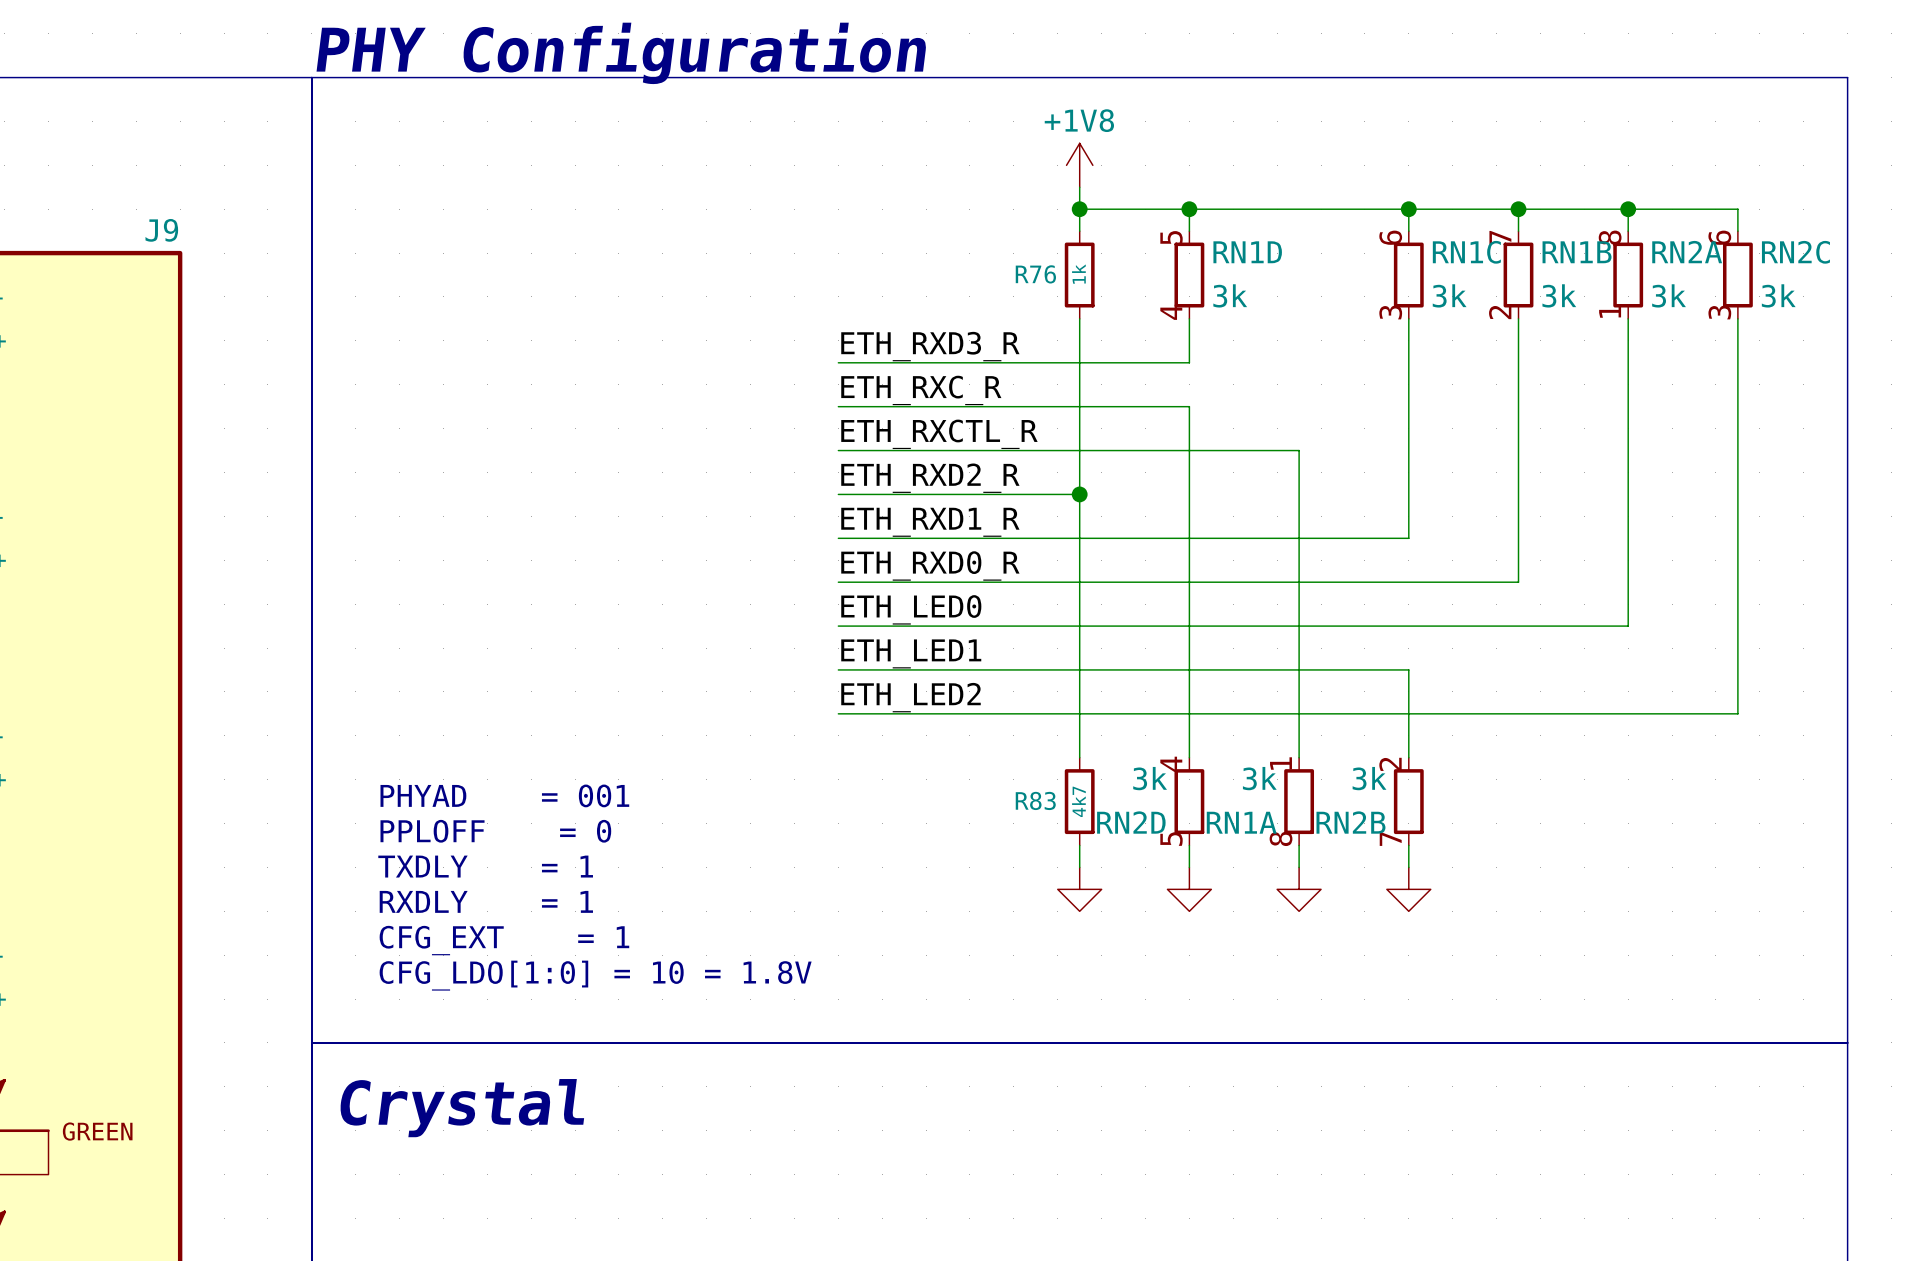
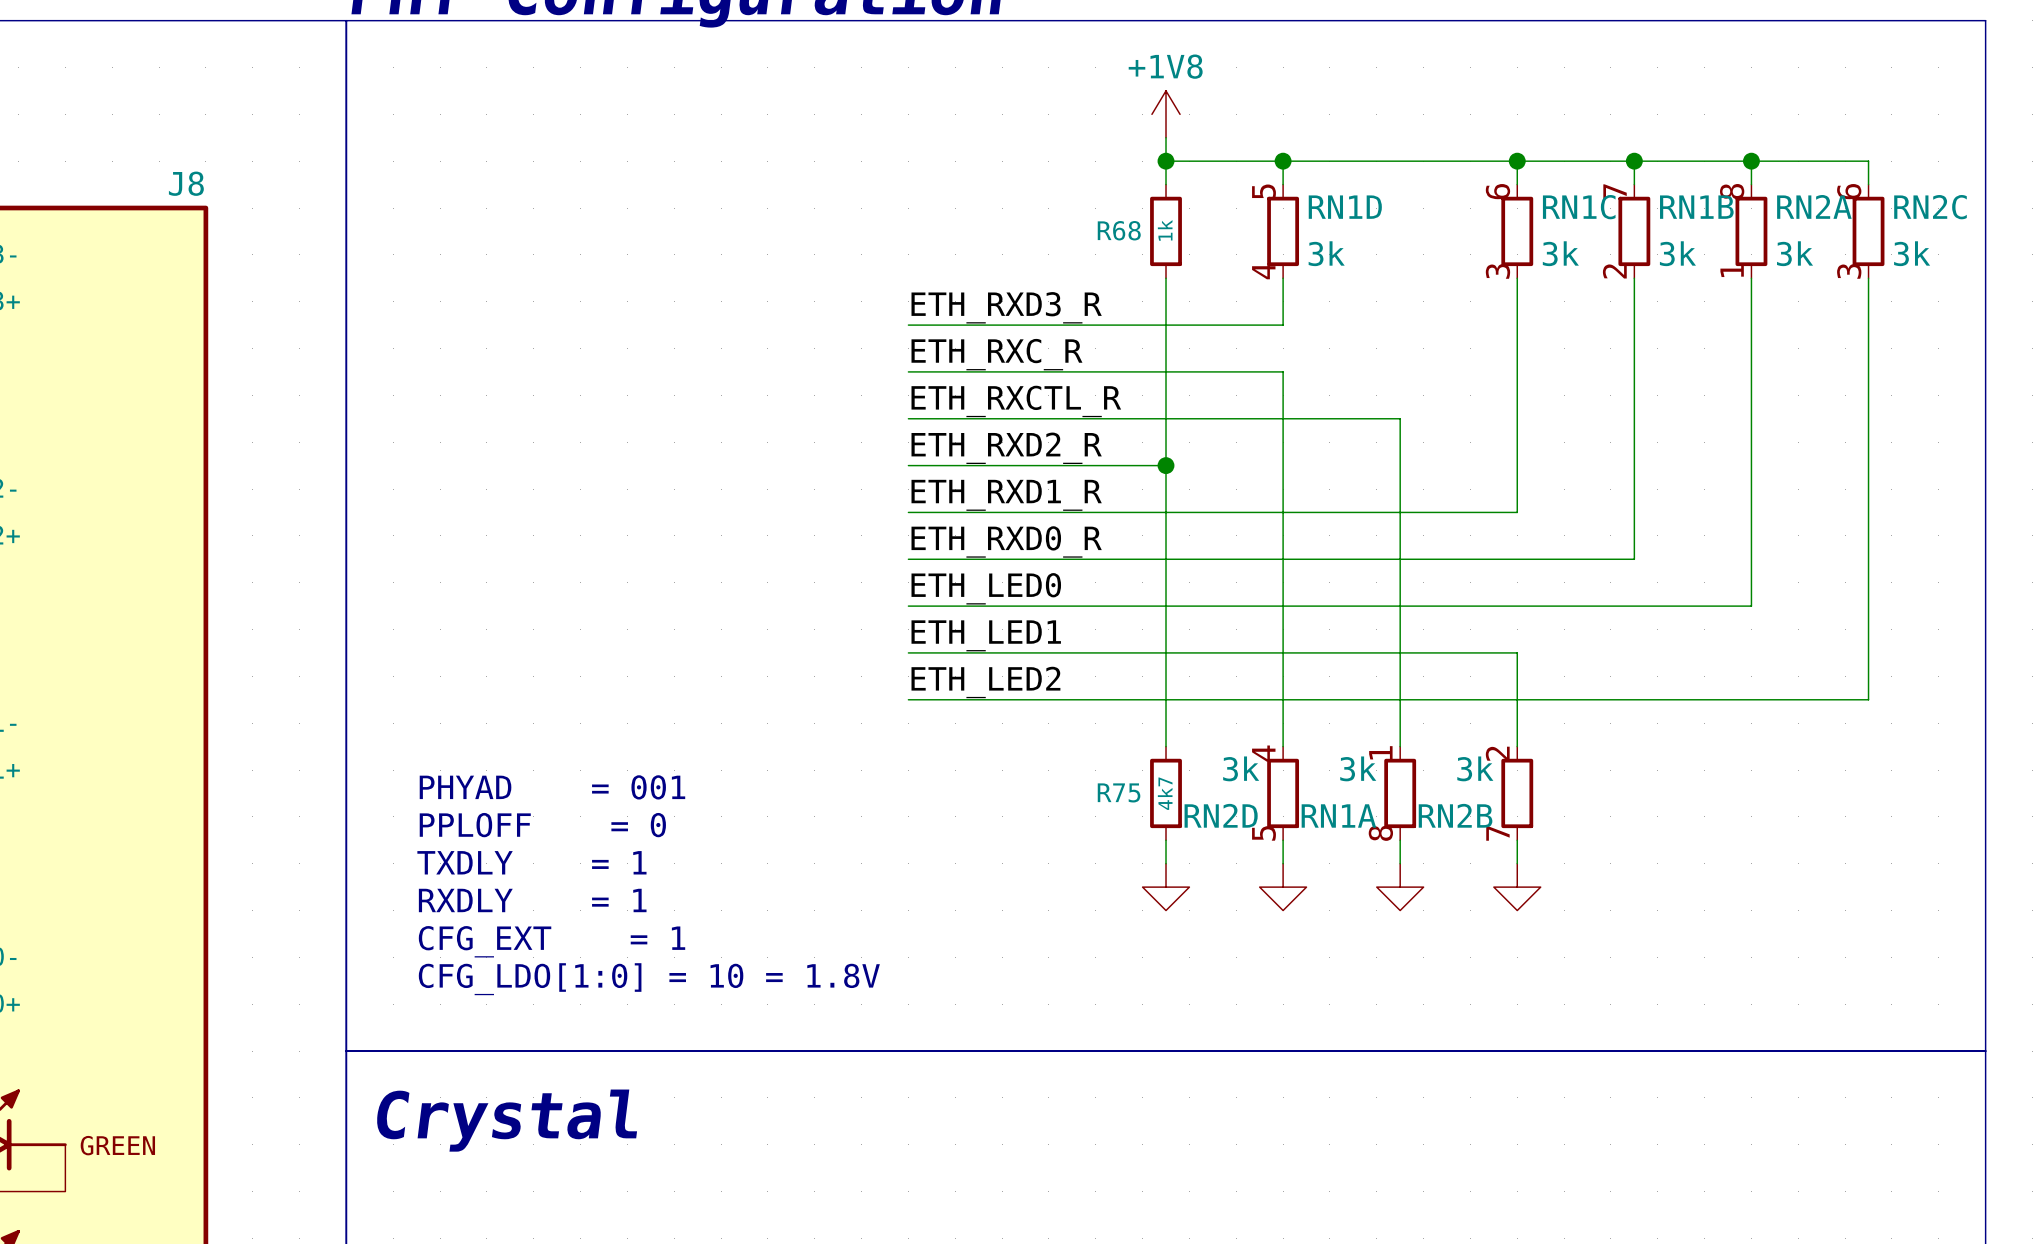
J9 name: J9 (161, 230) -> J8 (186, 183)
R76 name: R76 (1035, 274) -> R68 (1119, 230)
R83 name: R83 (1035, 800) -> R75 (1119, 792)

